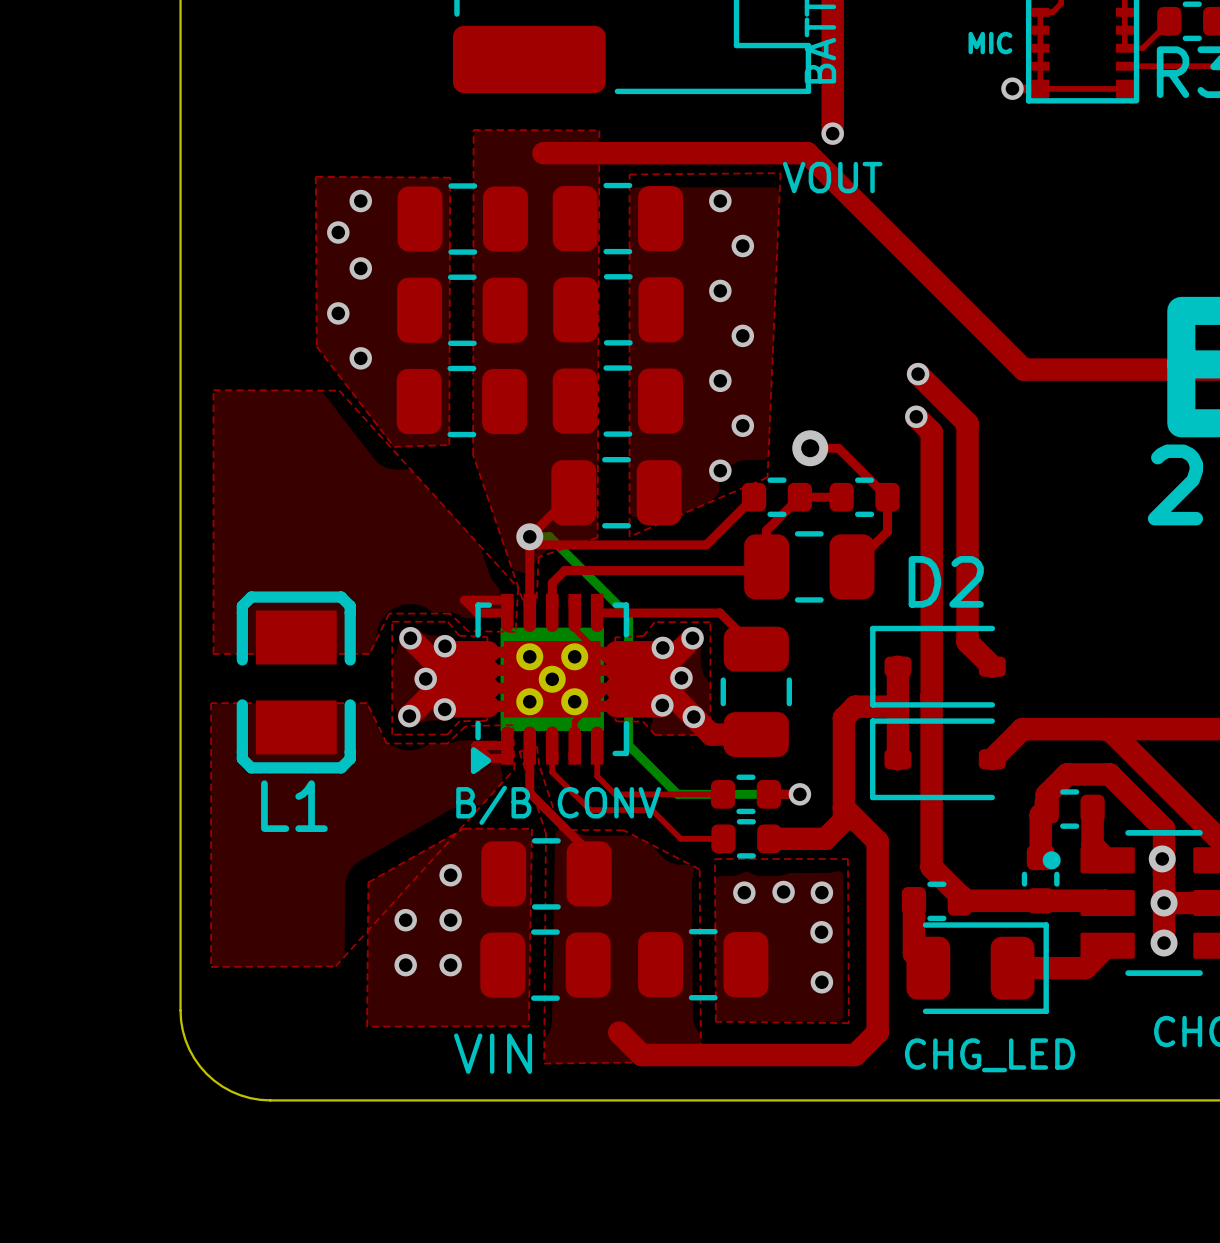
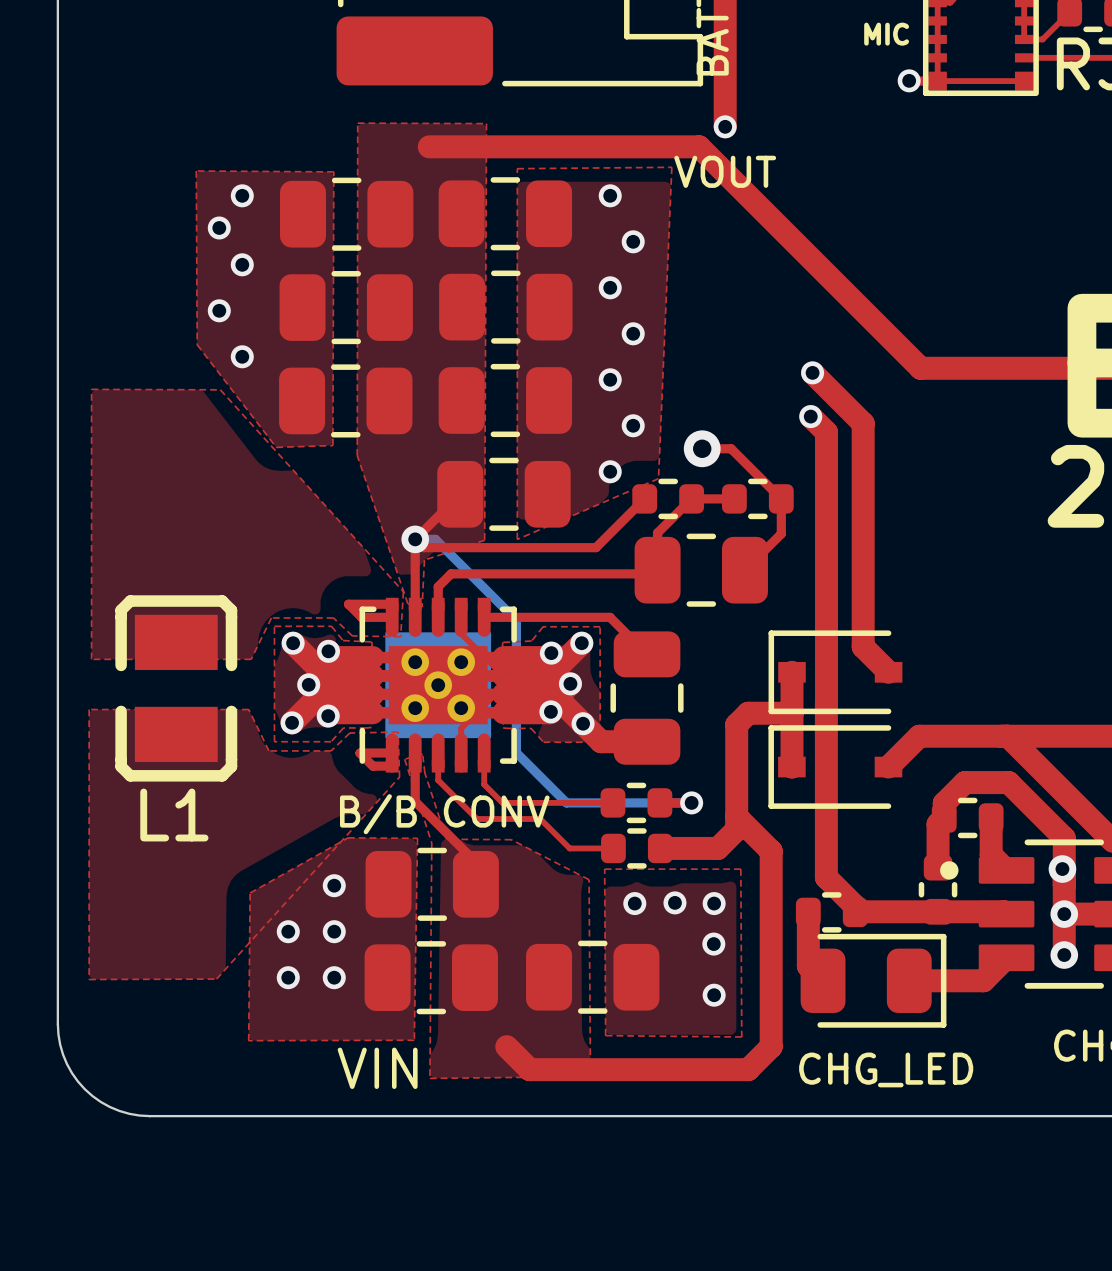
part footprint: [470, 593, 633, 775] -> [356, 597, 520, 773]
D2: (937, 666) -> none
part: none -> (835, 672)
part footprint: [869, 718, 1006, 801] -> [768, 725, 903, 809]

